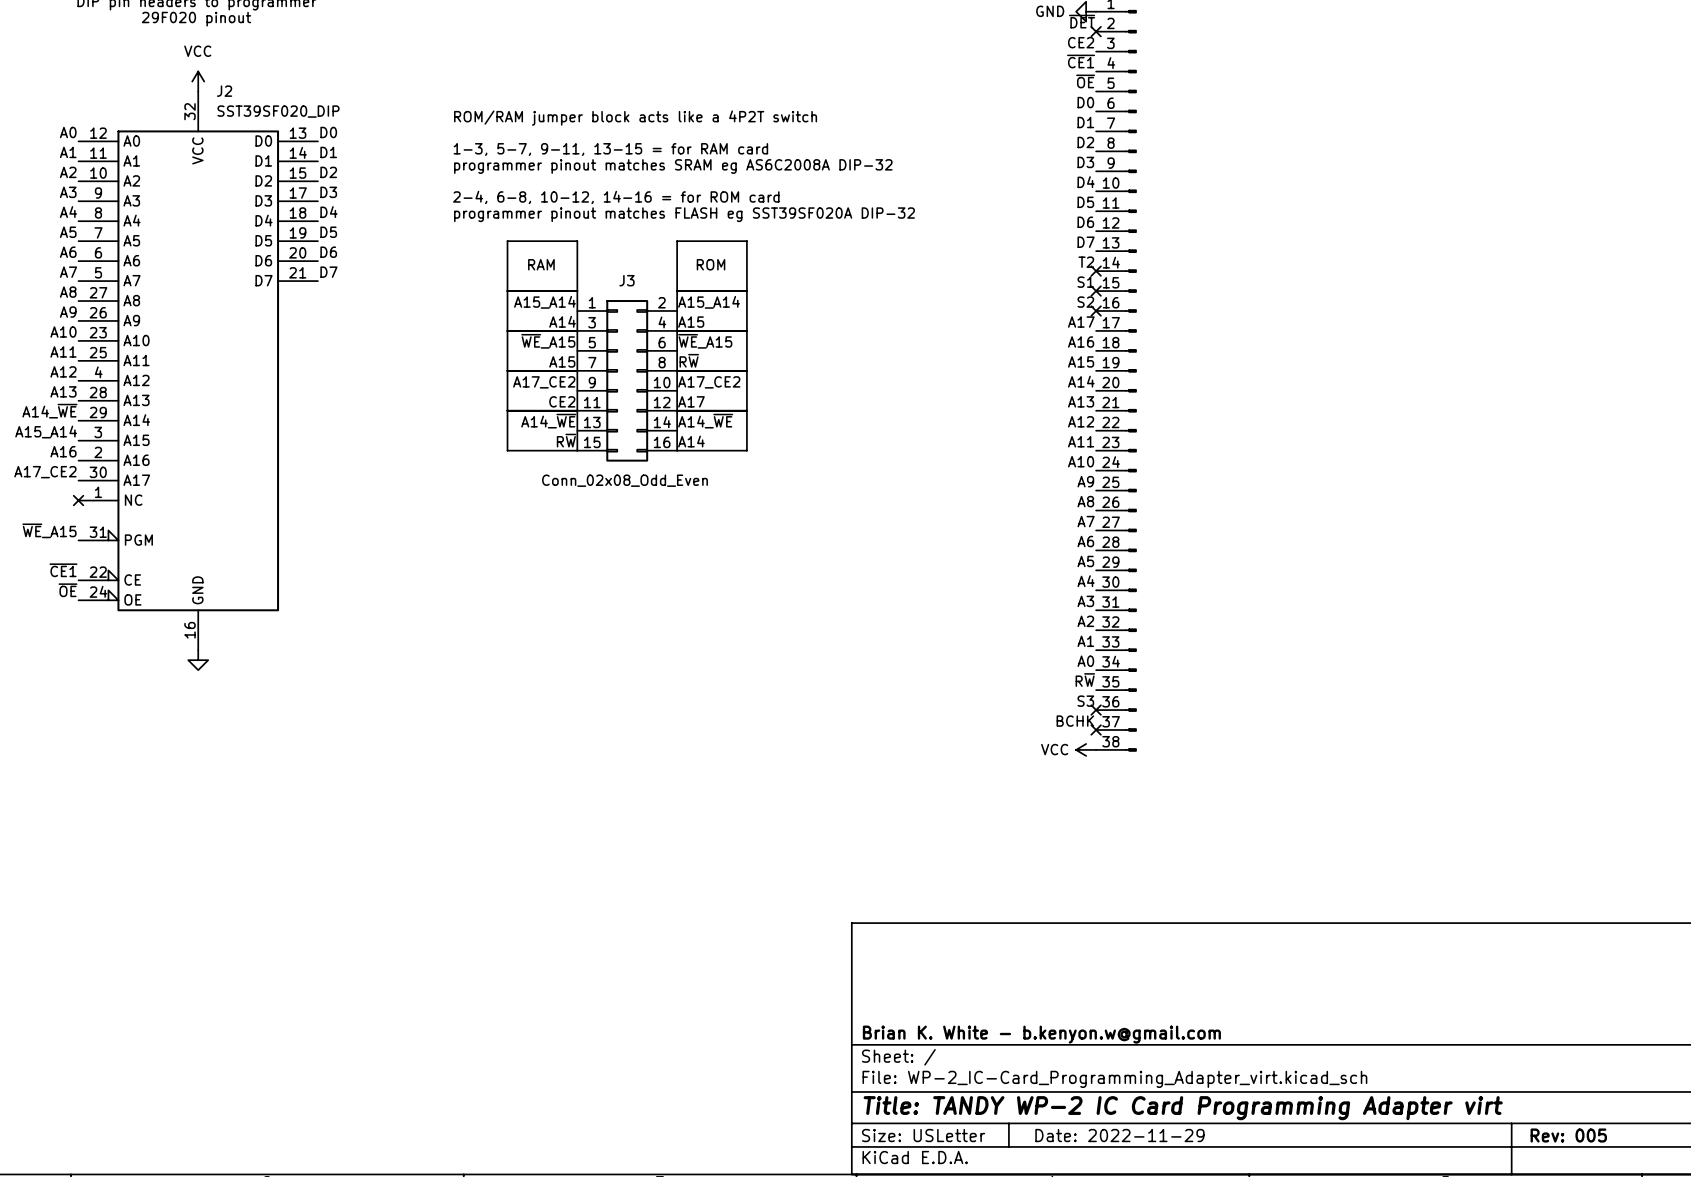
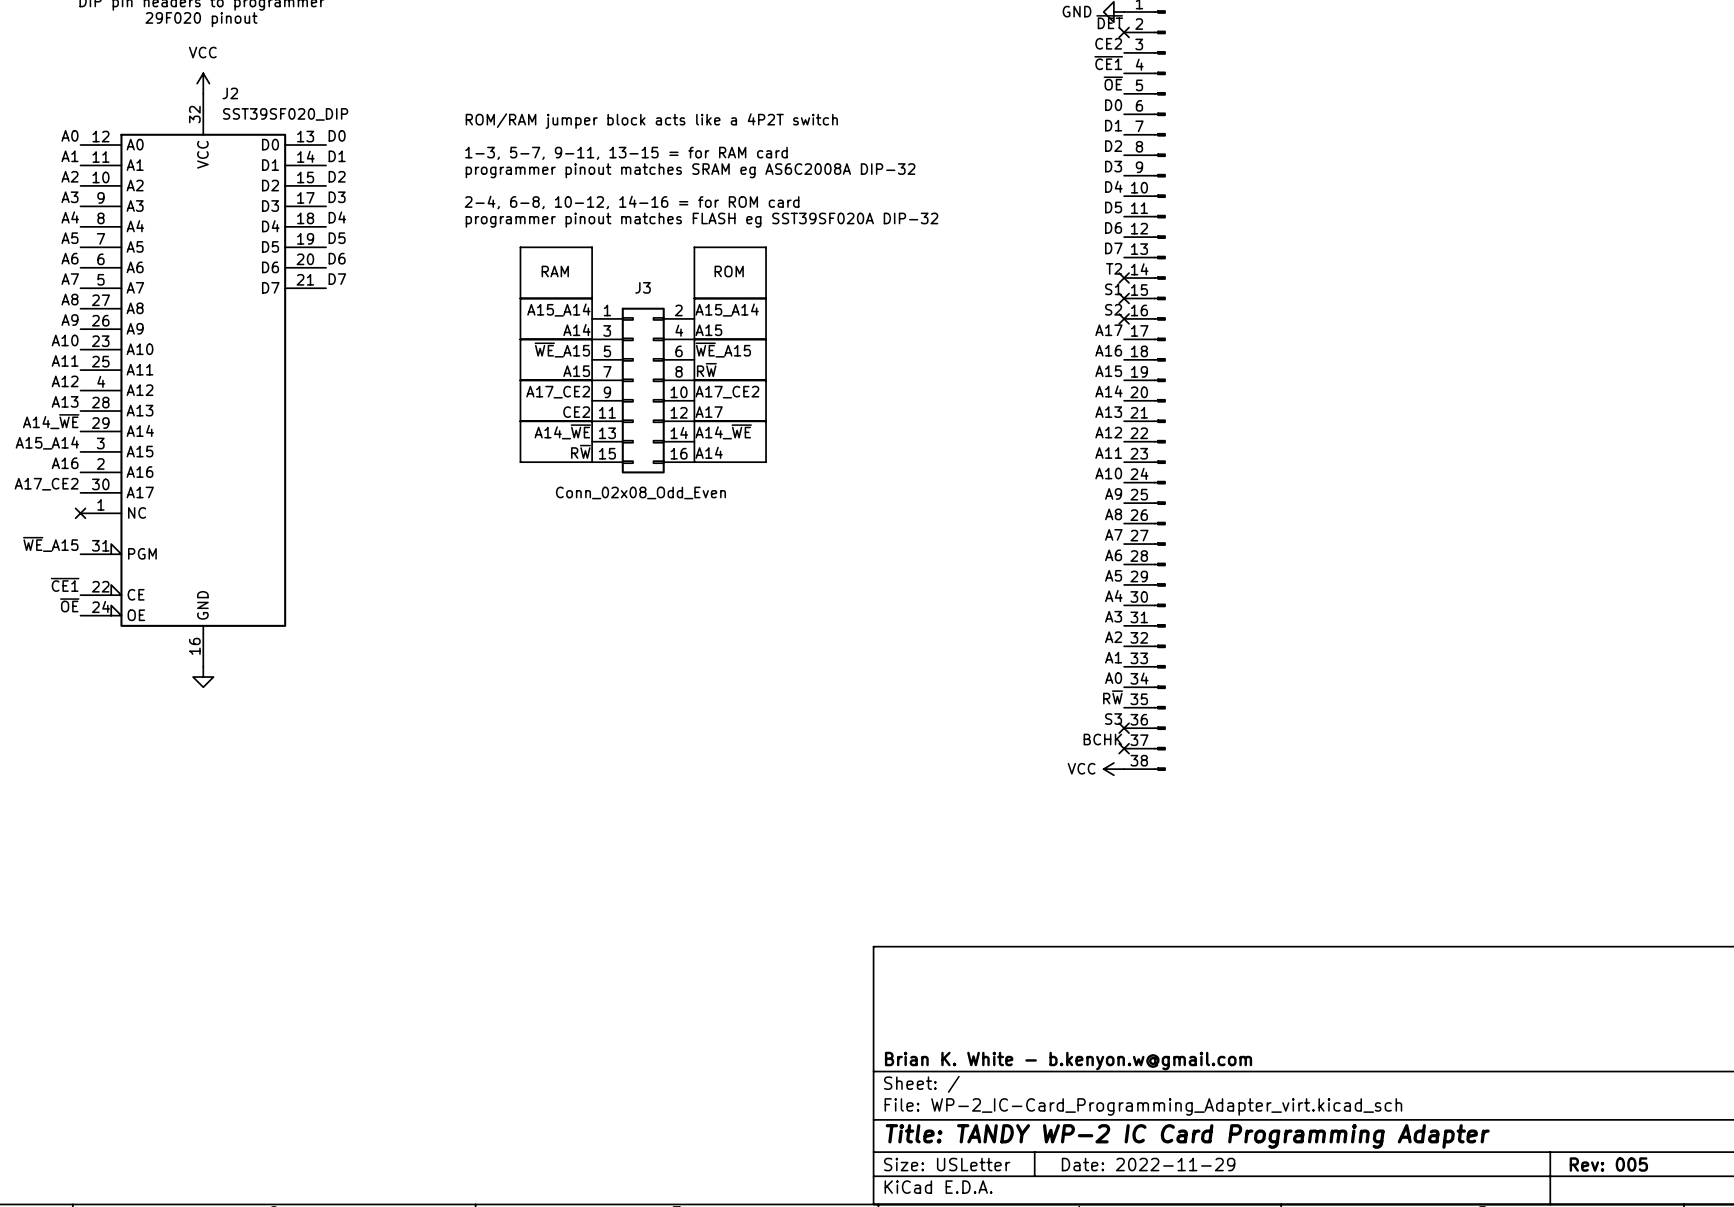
title block: Title: TANDY WP-2 IC Card Programming Adapter virt (1183, 1108) -> Title: TANDY WP-2 IC Card Programming Adapter (1187, 1136)

